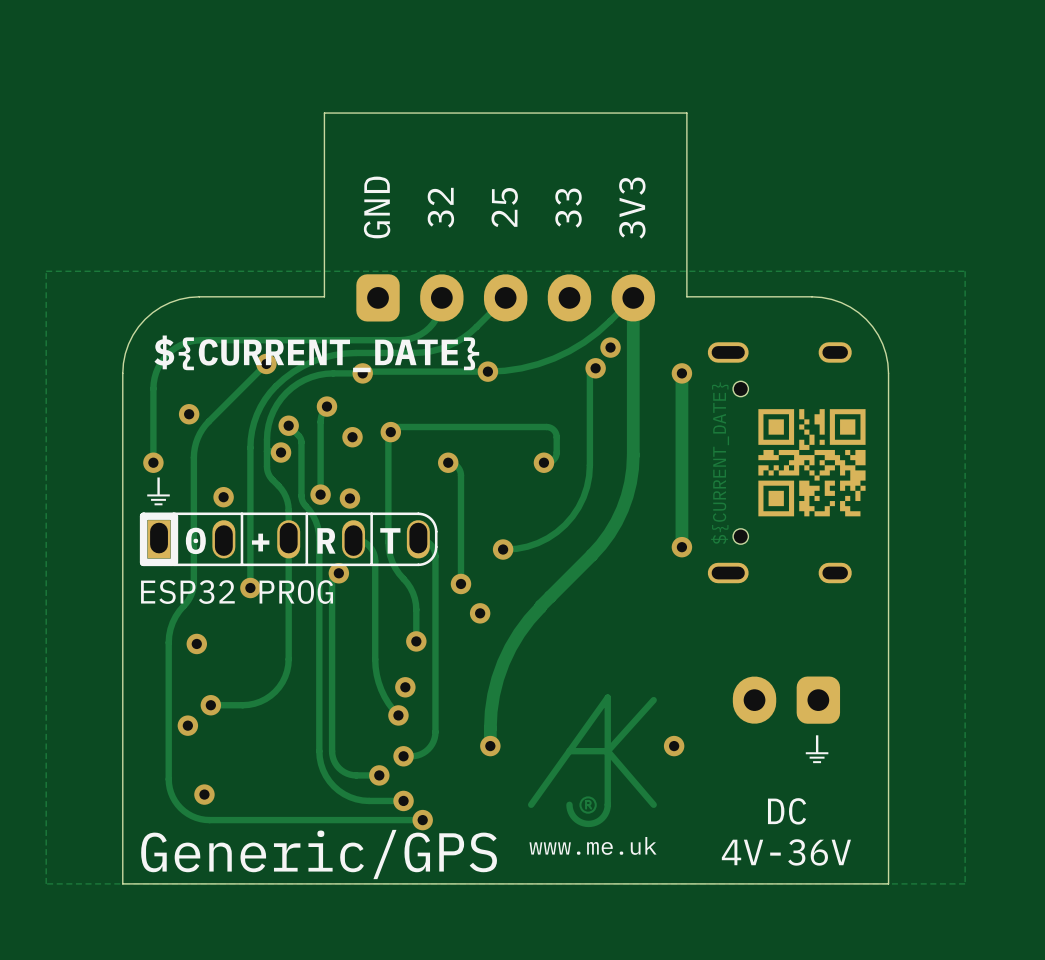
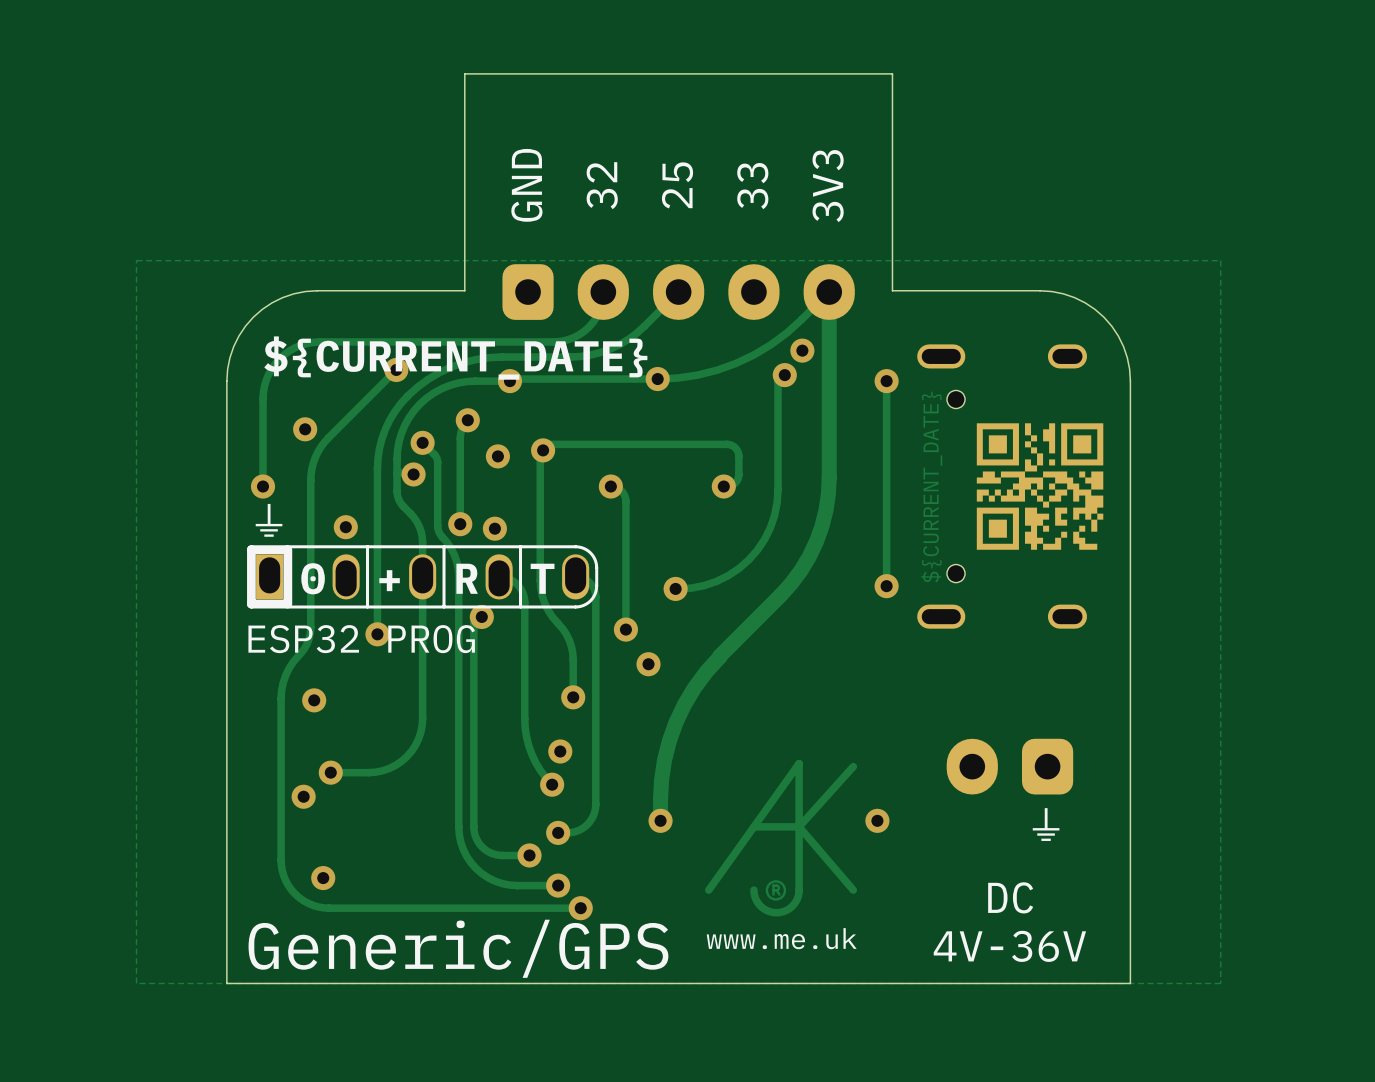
track width: thick (681, 373) (681, 547) -> thin (886, 381) (886, 586)

